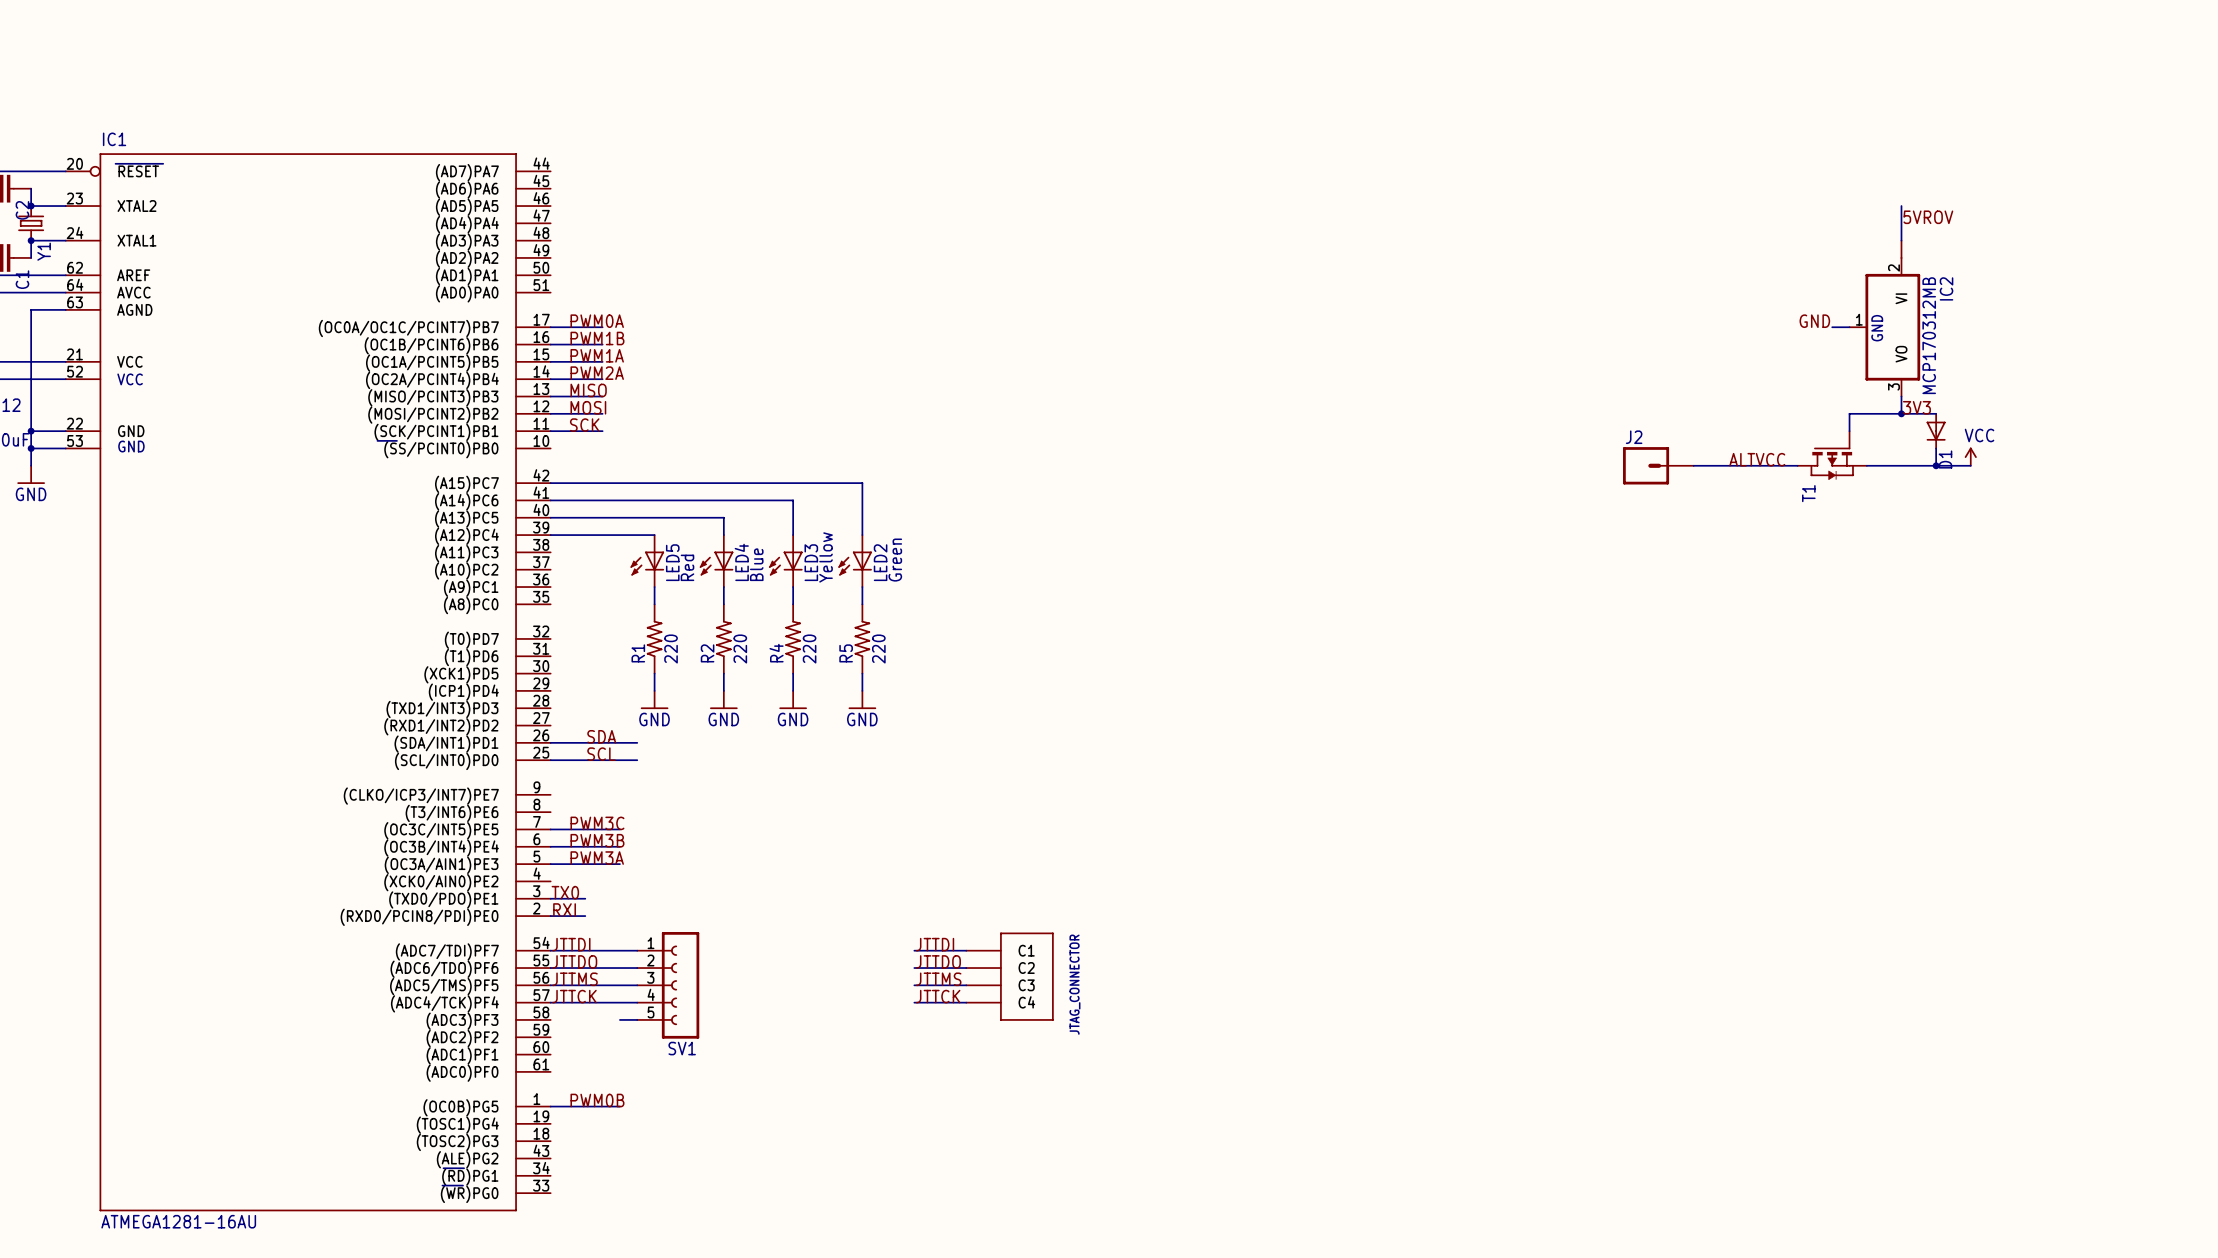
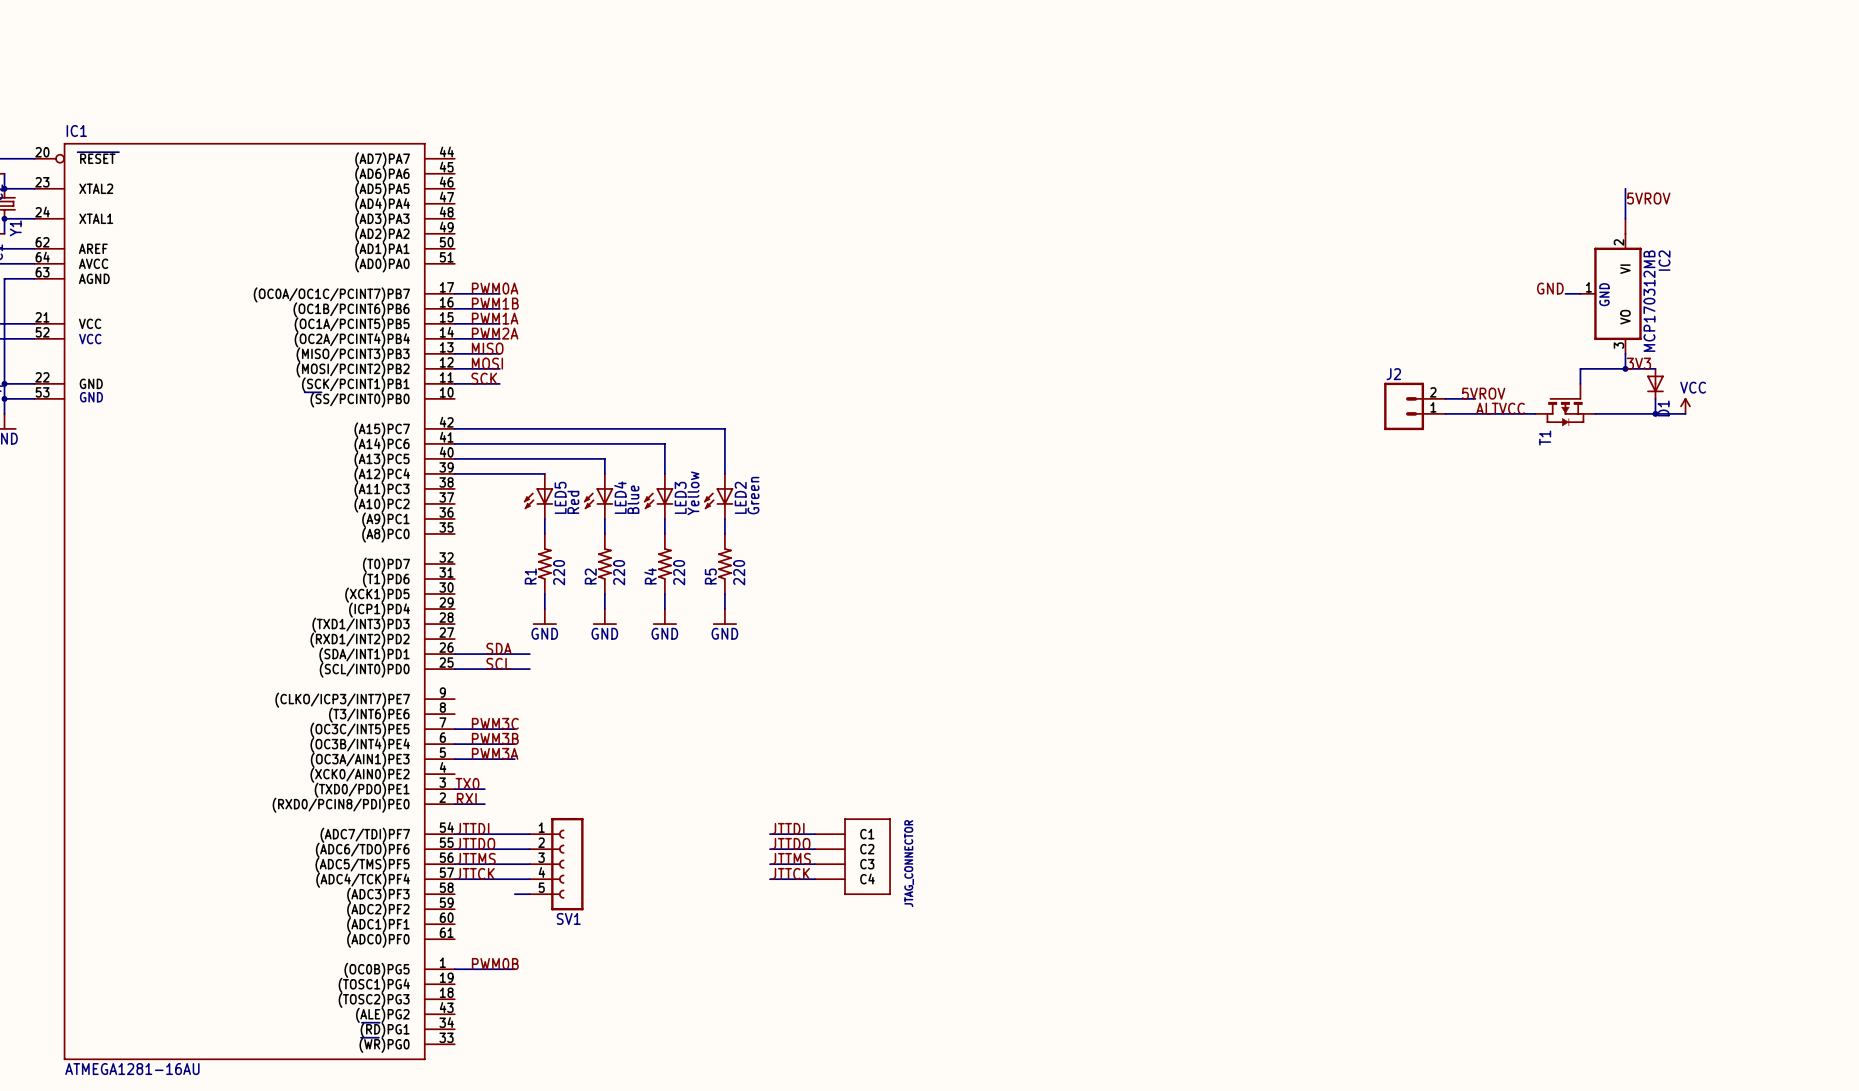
label: none -> 5VROV (1483, 393)
J2 symbol: [1623, 447, 1694, 485] -> [1384, 382, 1446, 431]
wire: none -> (1445, 398) (1475, 398)

